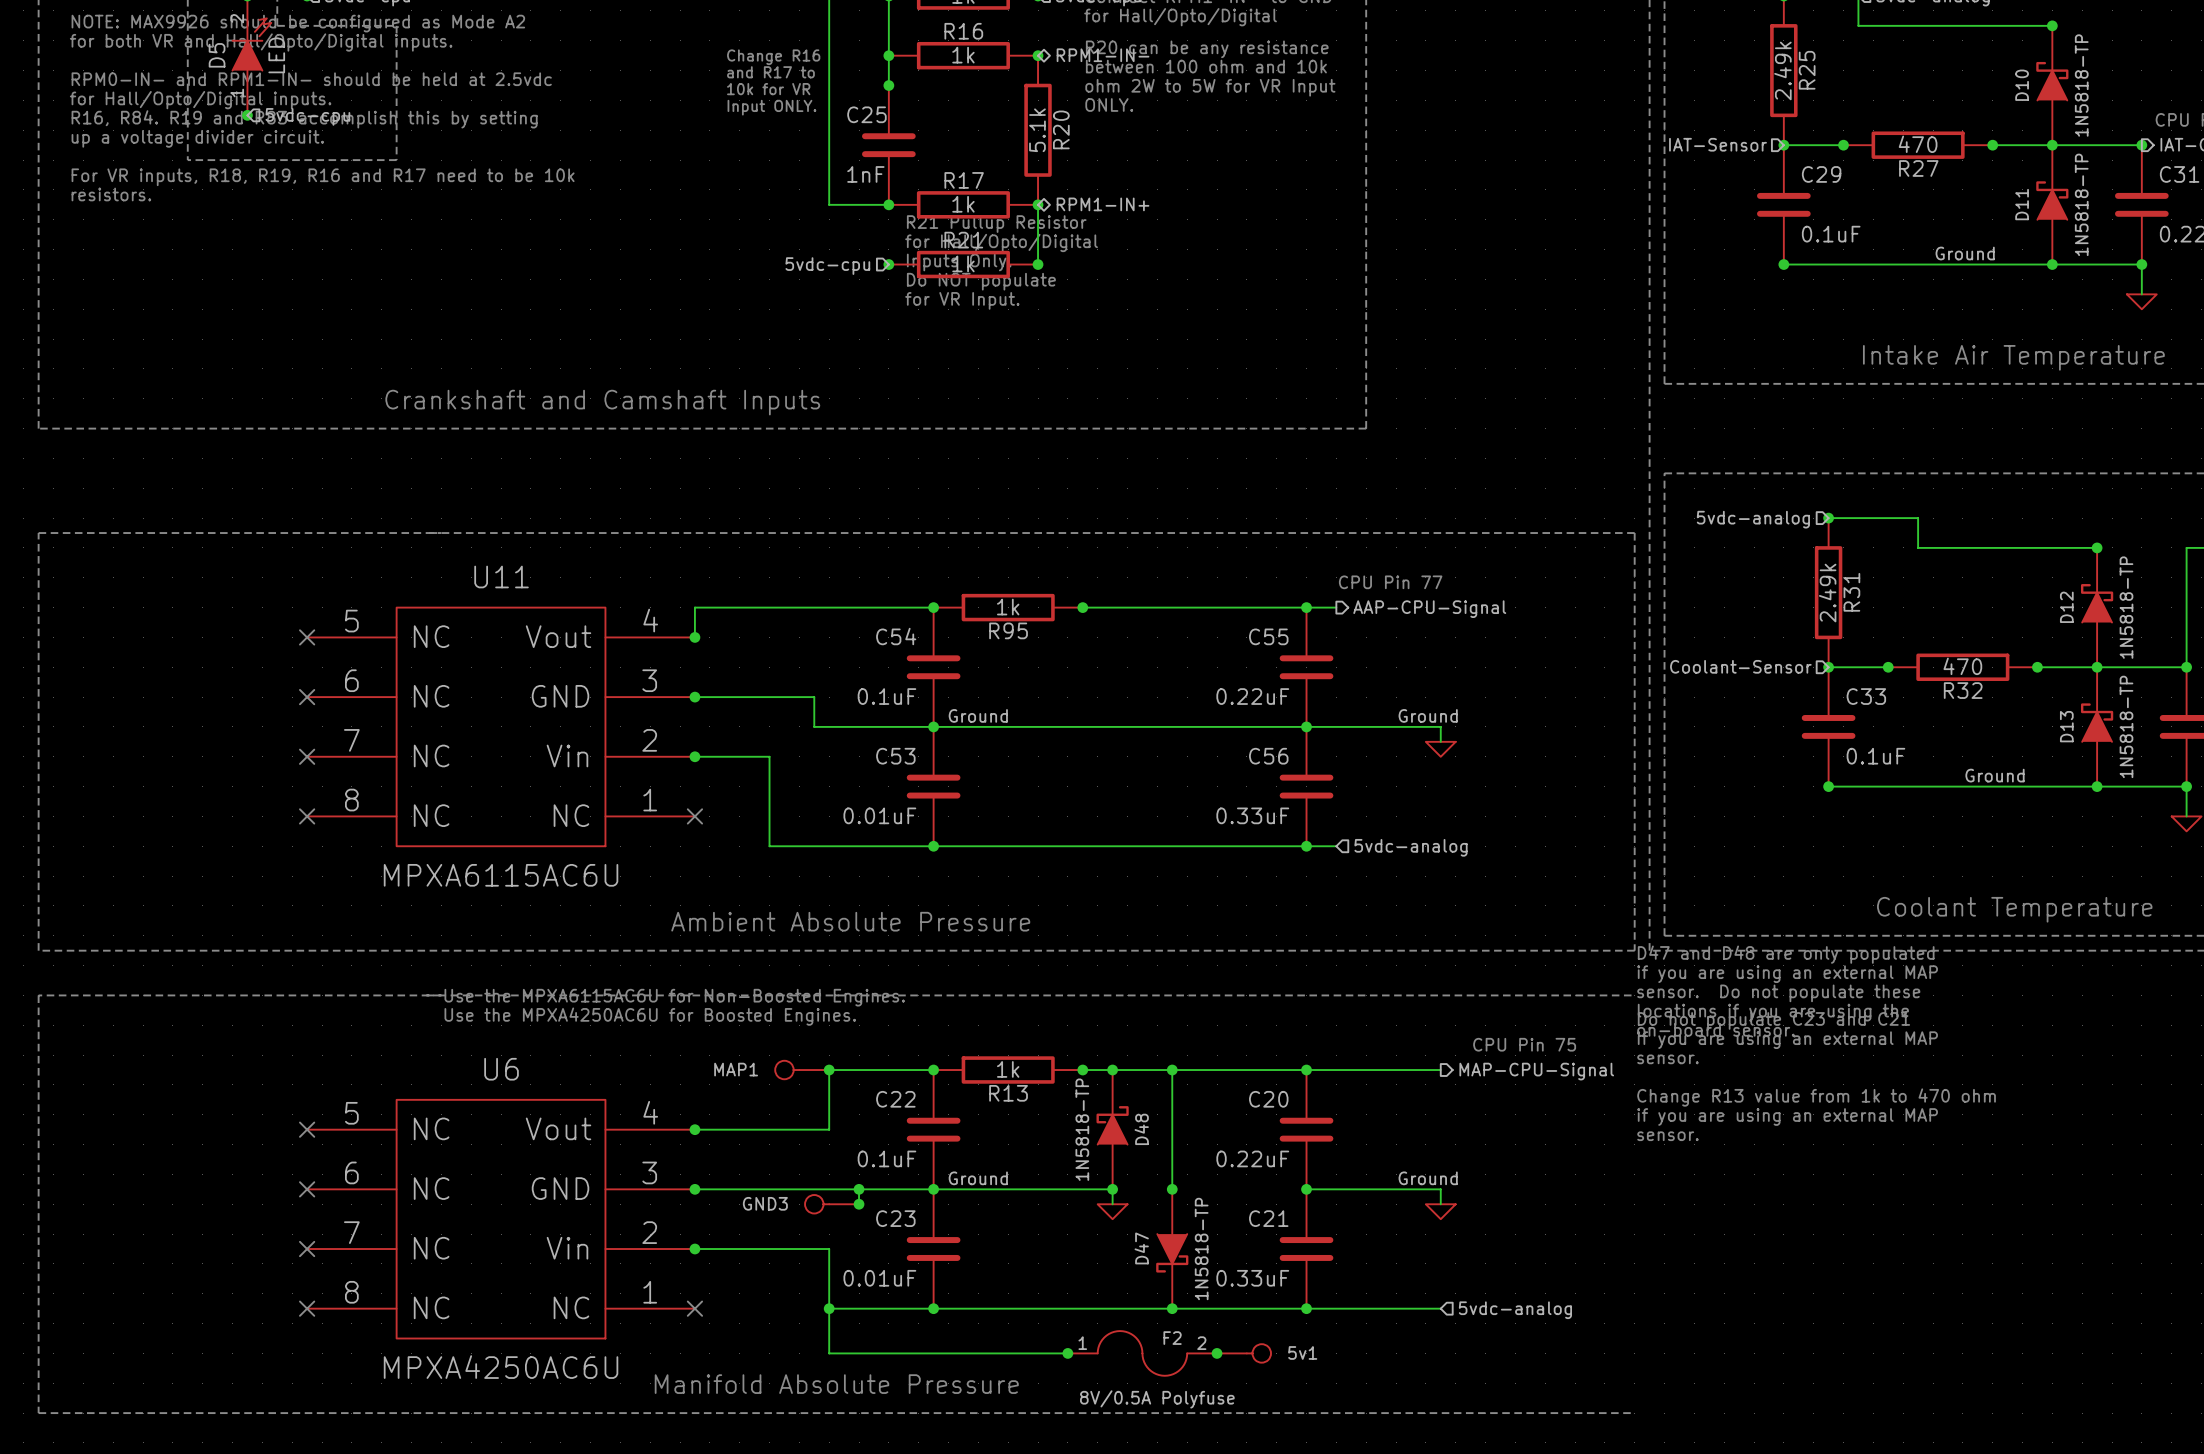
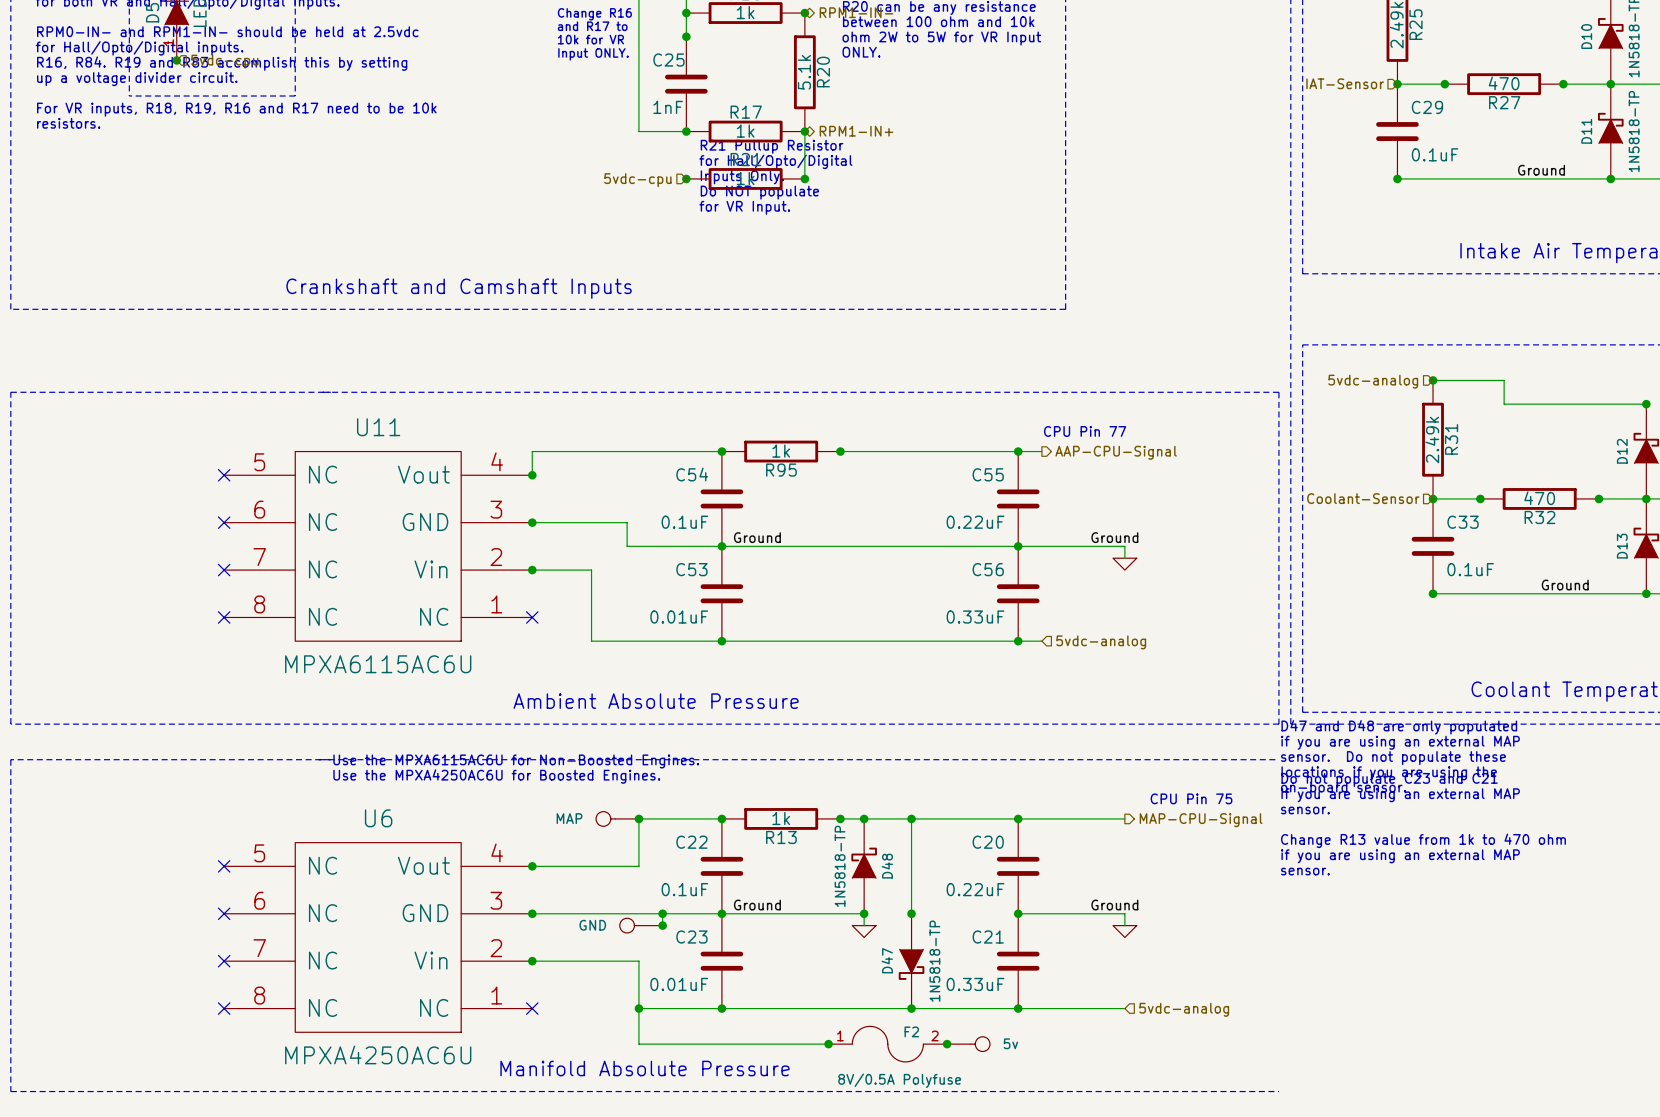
MAP1 name: MAP1 (736, 1069) -> MAP (569, 818)
GND3 name: GND3 (765, 1203) -> GND (592, 925)
5v1 name: 5v1 (1302, 1352) -> 5v (1010, 1043)

